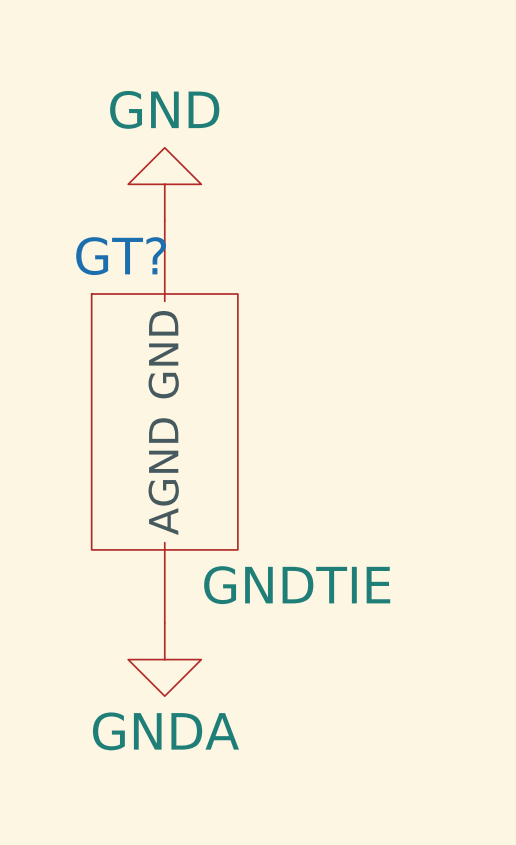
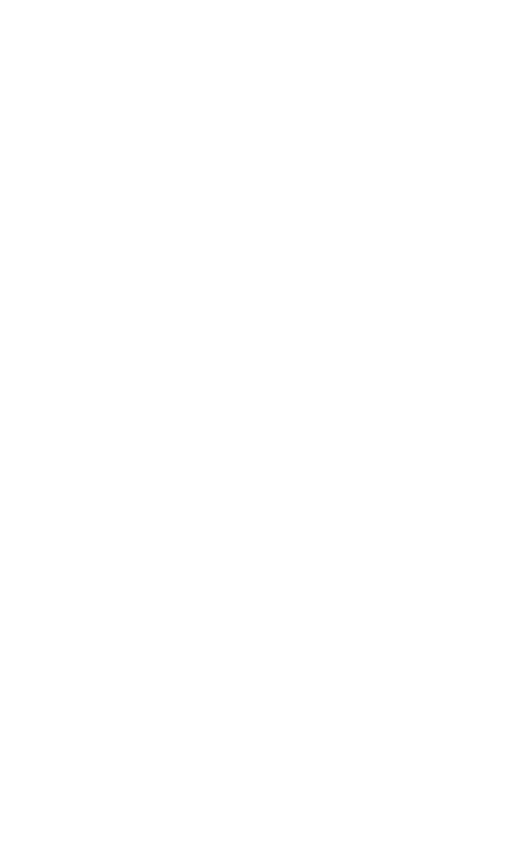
power symbol: GND (164, 184) -> none
GT?: GNDTIE (164, 421) -> none
power symbol: GNDA (164, 659) -> none

